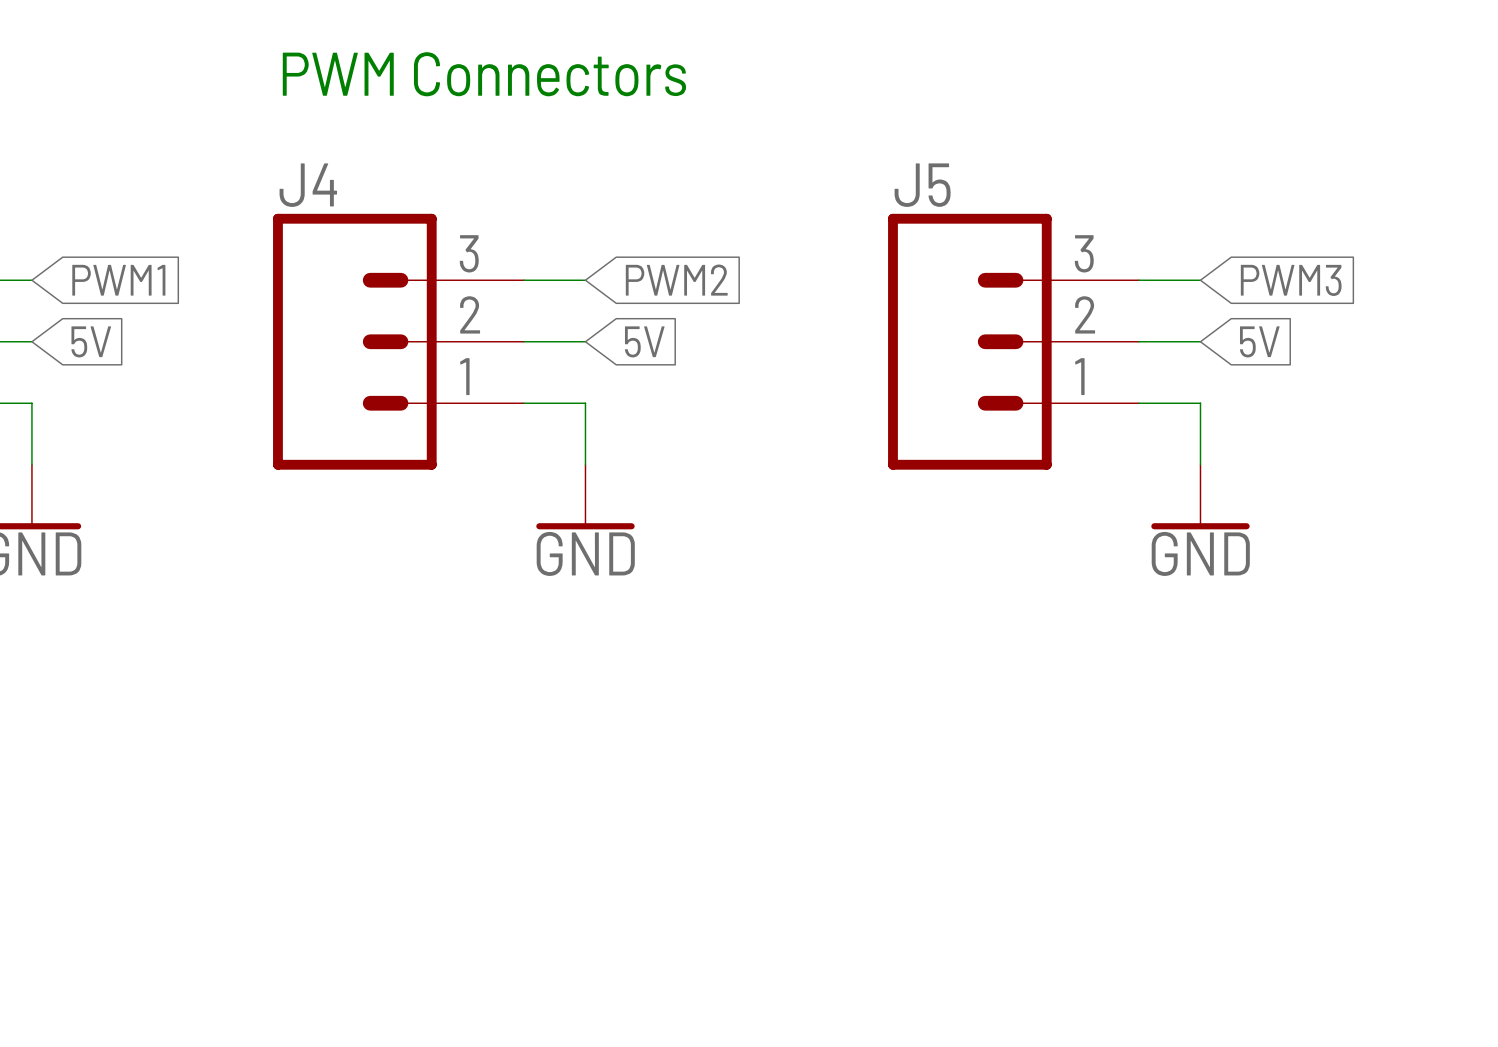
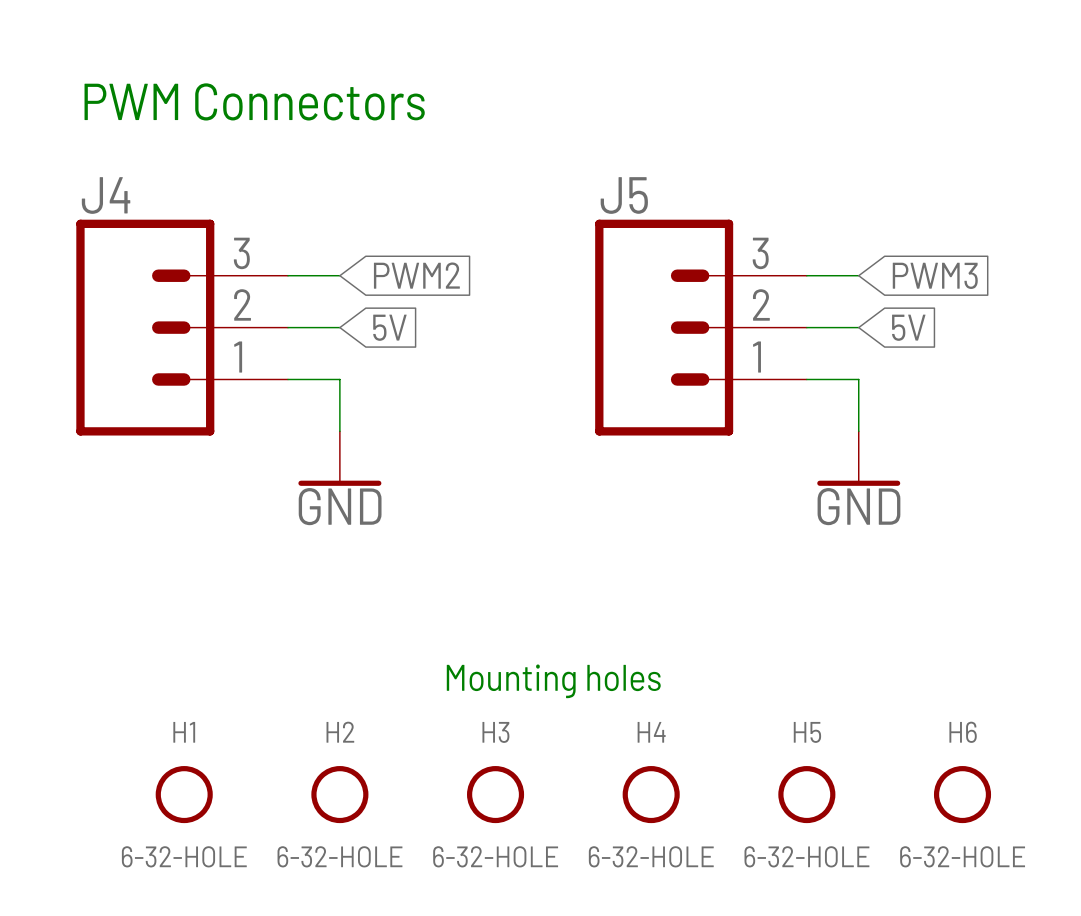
text: none -> Mounting holes (553, 681)
H1: none -> 6-32-HOLE (184, 794)
H2: none -> 6-32-HOLE (339, 794)
H3: none -> 6-32-HOLE (495, 794)
H4: none -> 6-32-HOLE (651, 794)
H5: none -> 6-32-HOLE (806, 794)
H6: none -> 6-32-HOLE (962, 794)

